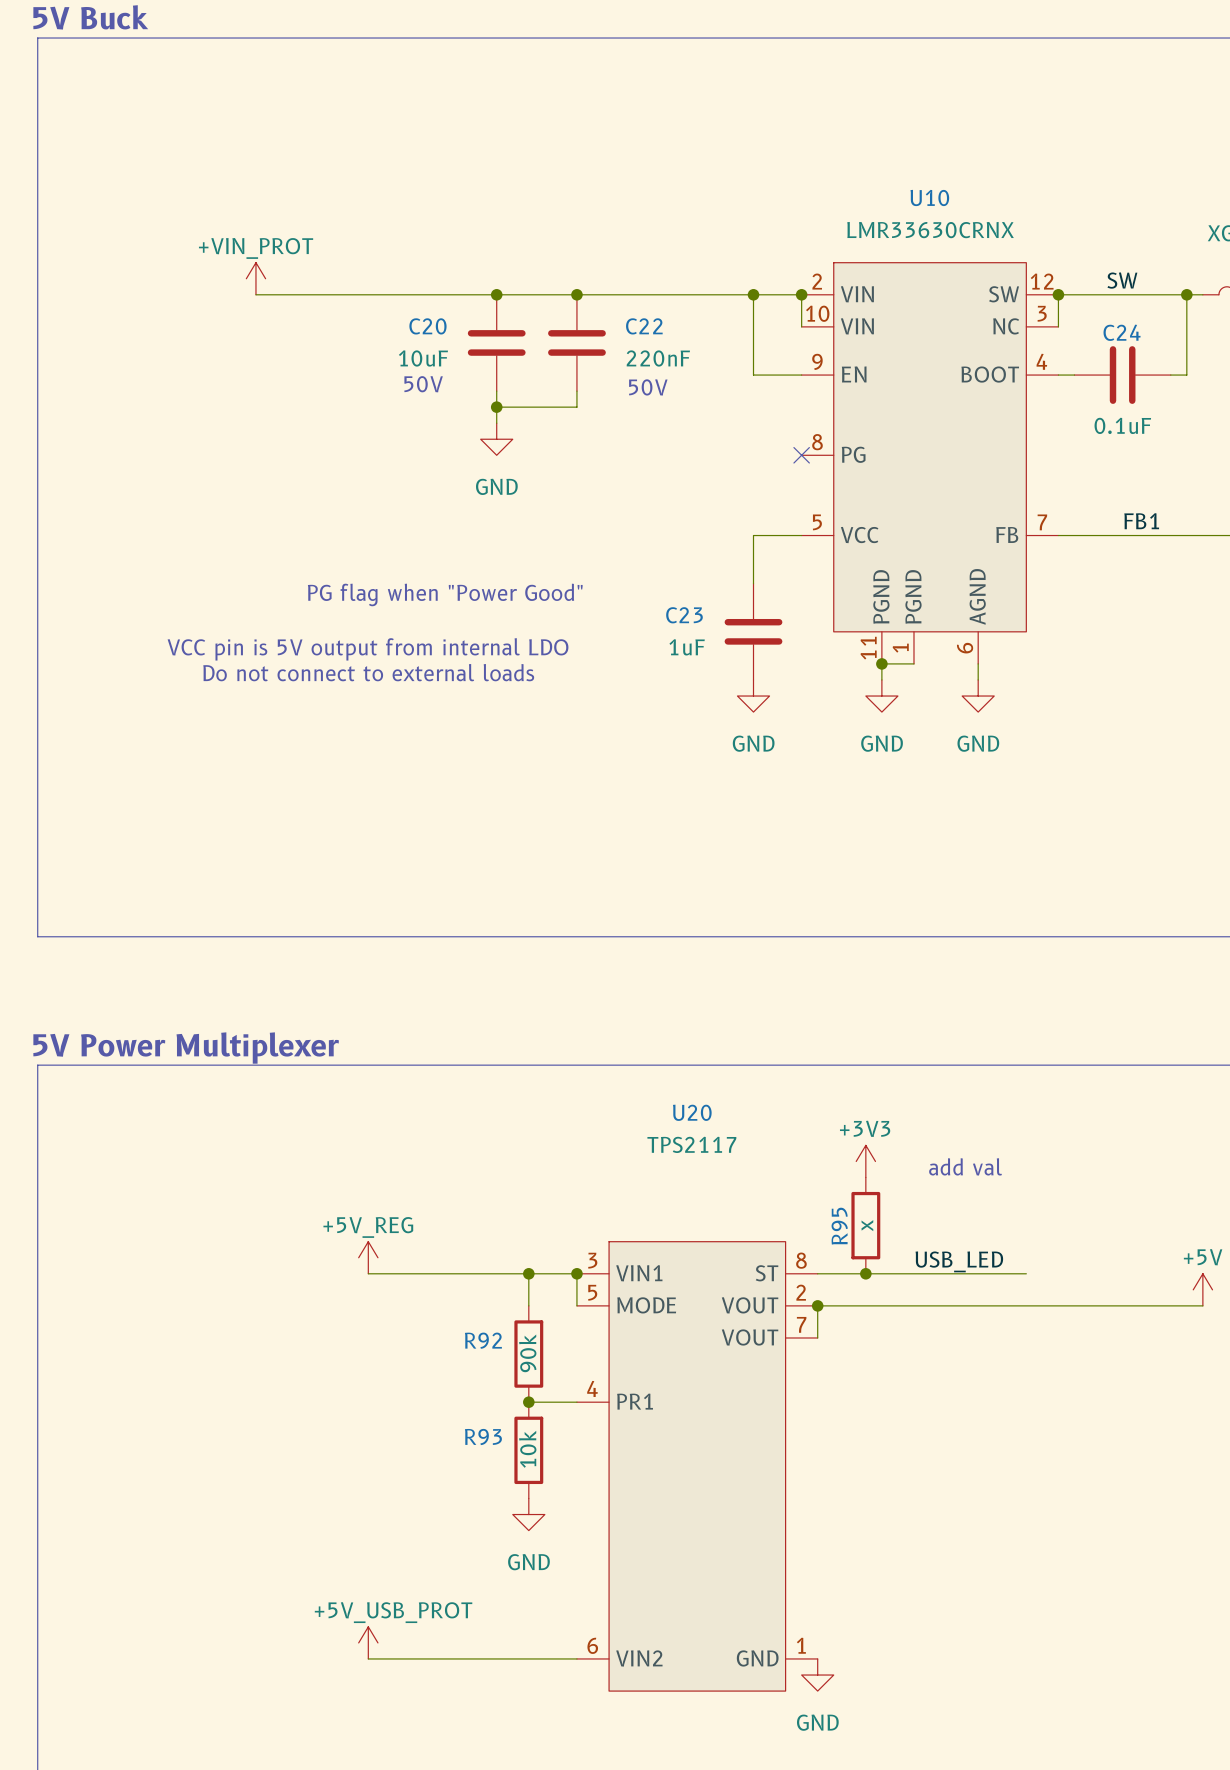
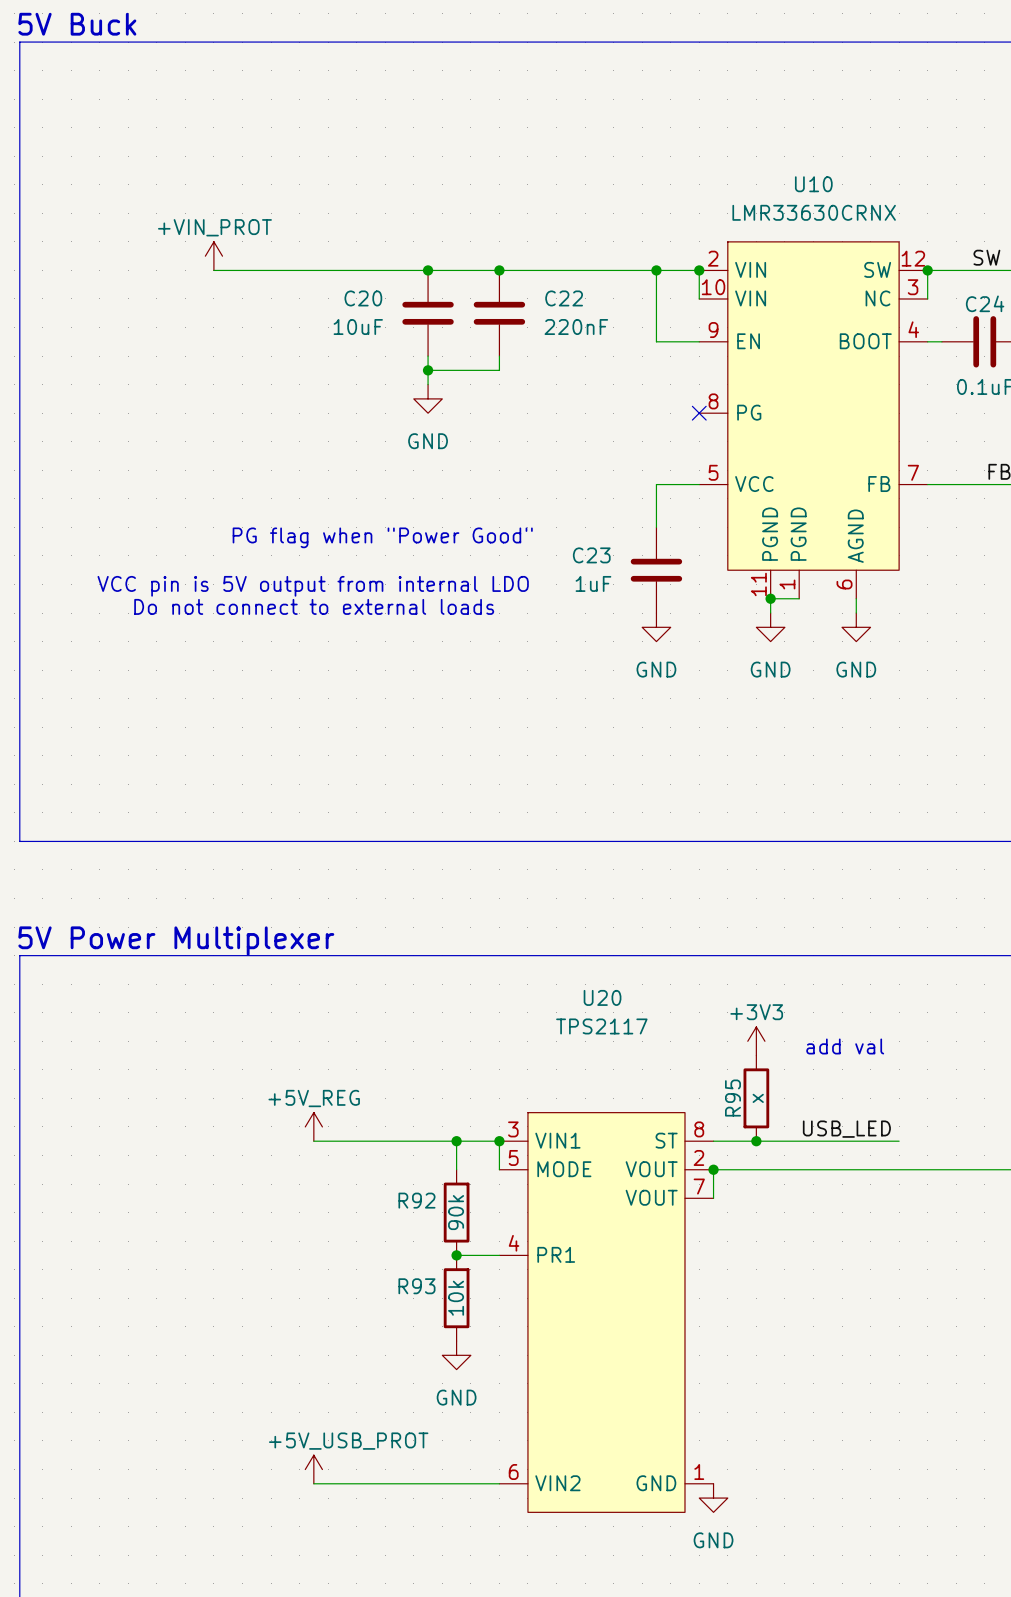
text: 50V (423, 384) -> none
text: 50V (648, 387) -> none

